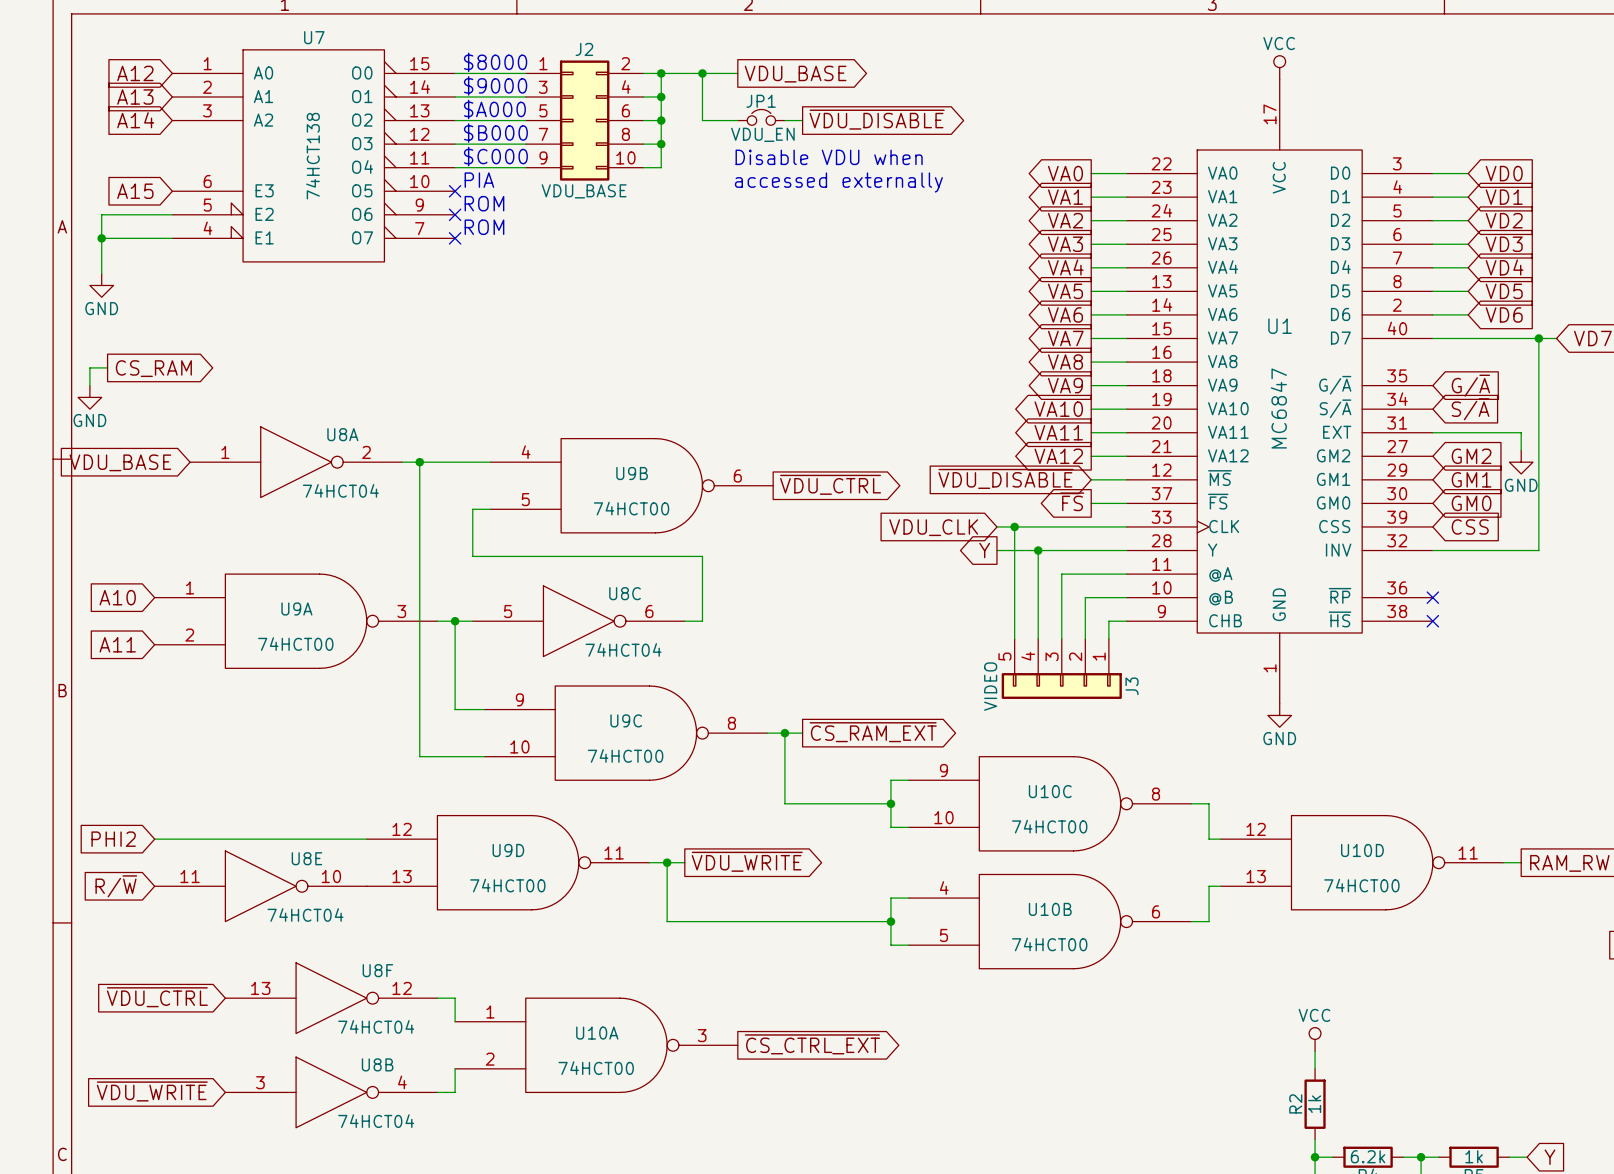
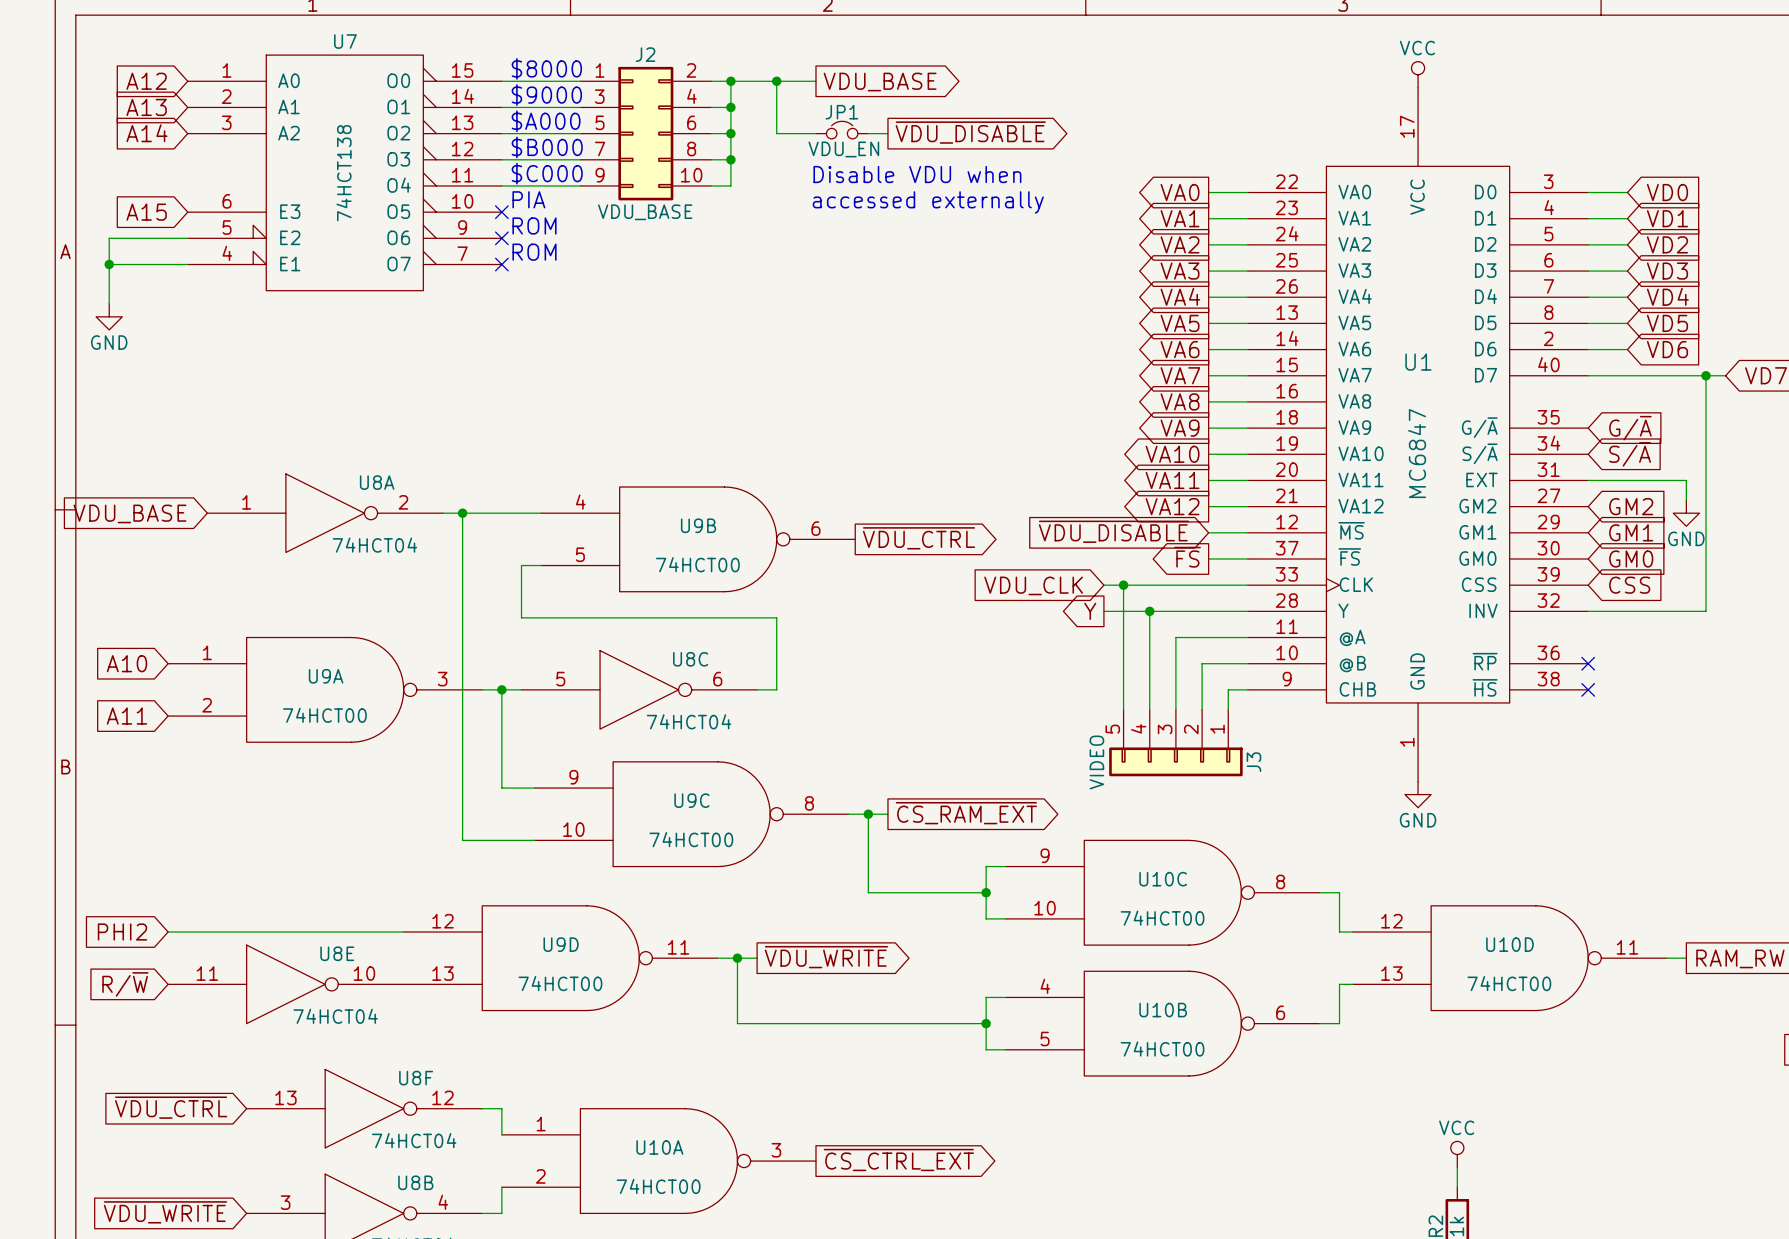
wire: (107, 367) (89, 367) (89, 385) -> none
global label: CS_RAM (153, 368) -> none
power symbol: GND (89, 397) -> none

